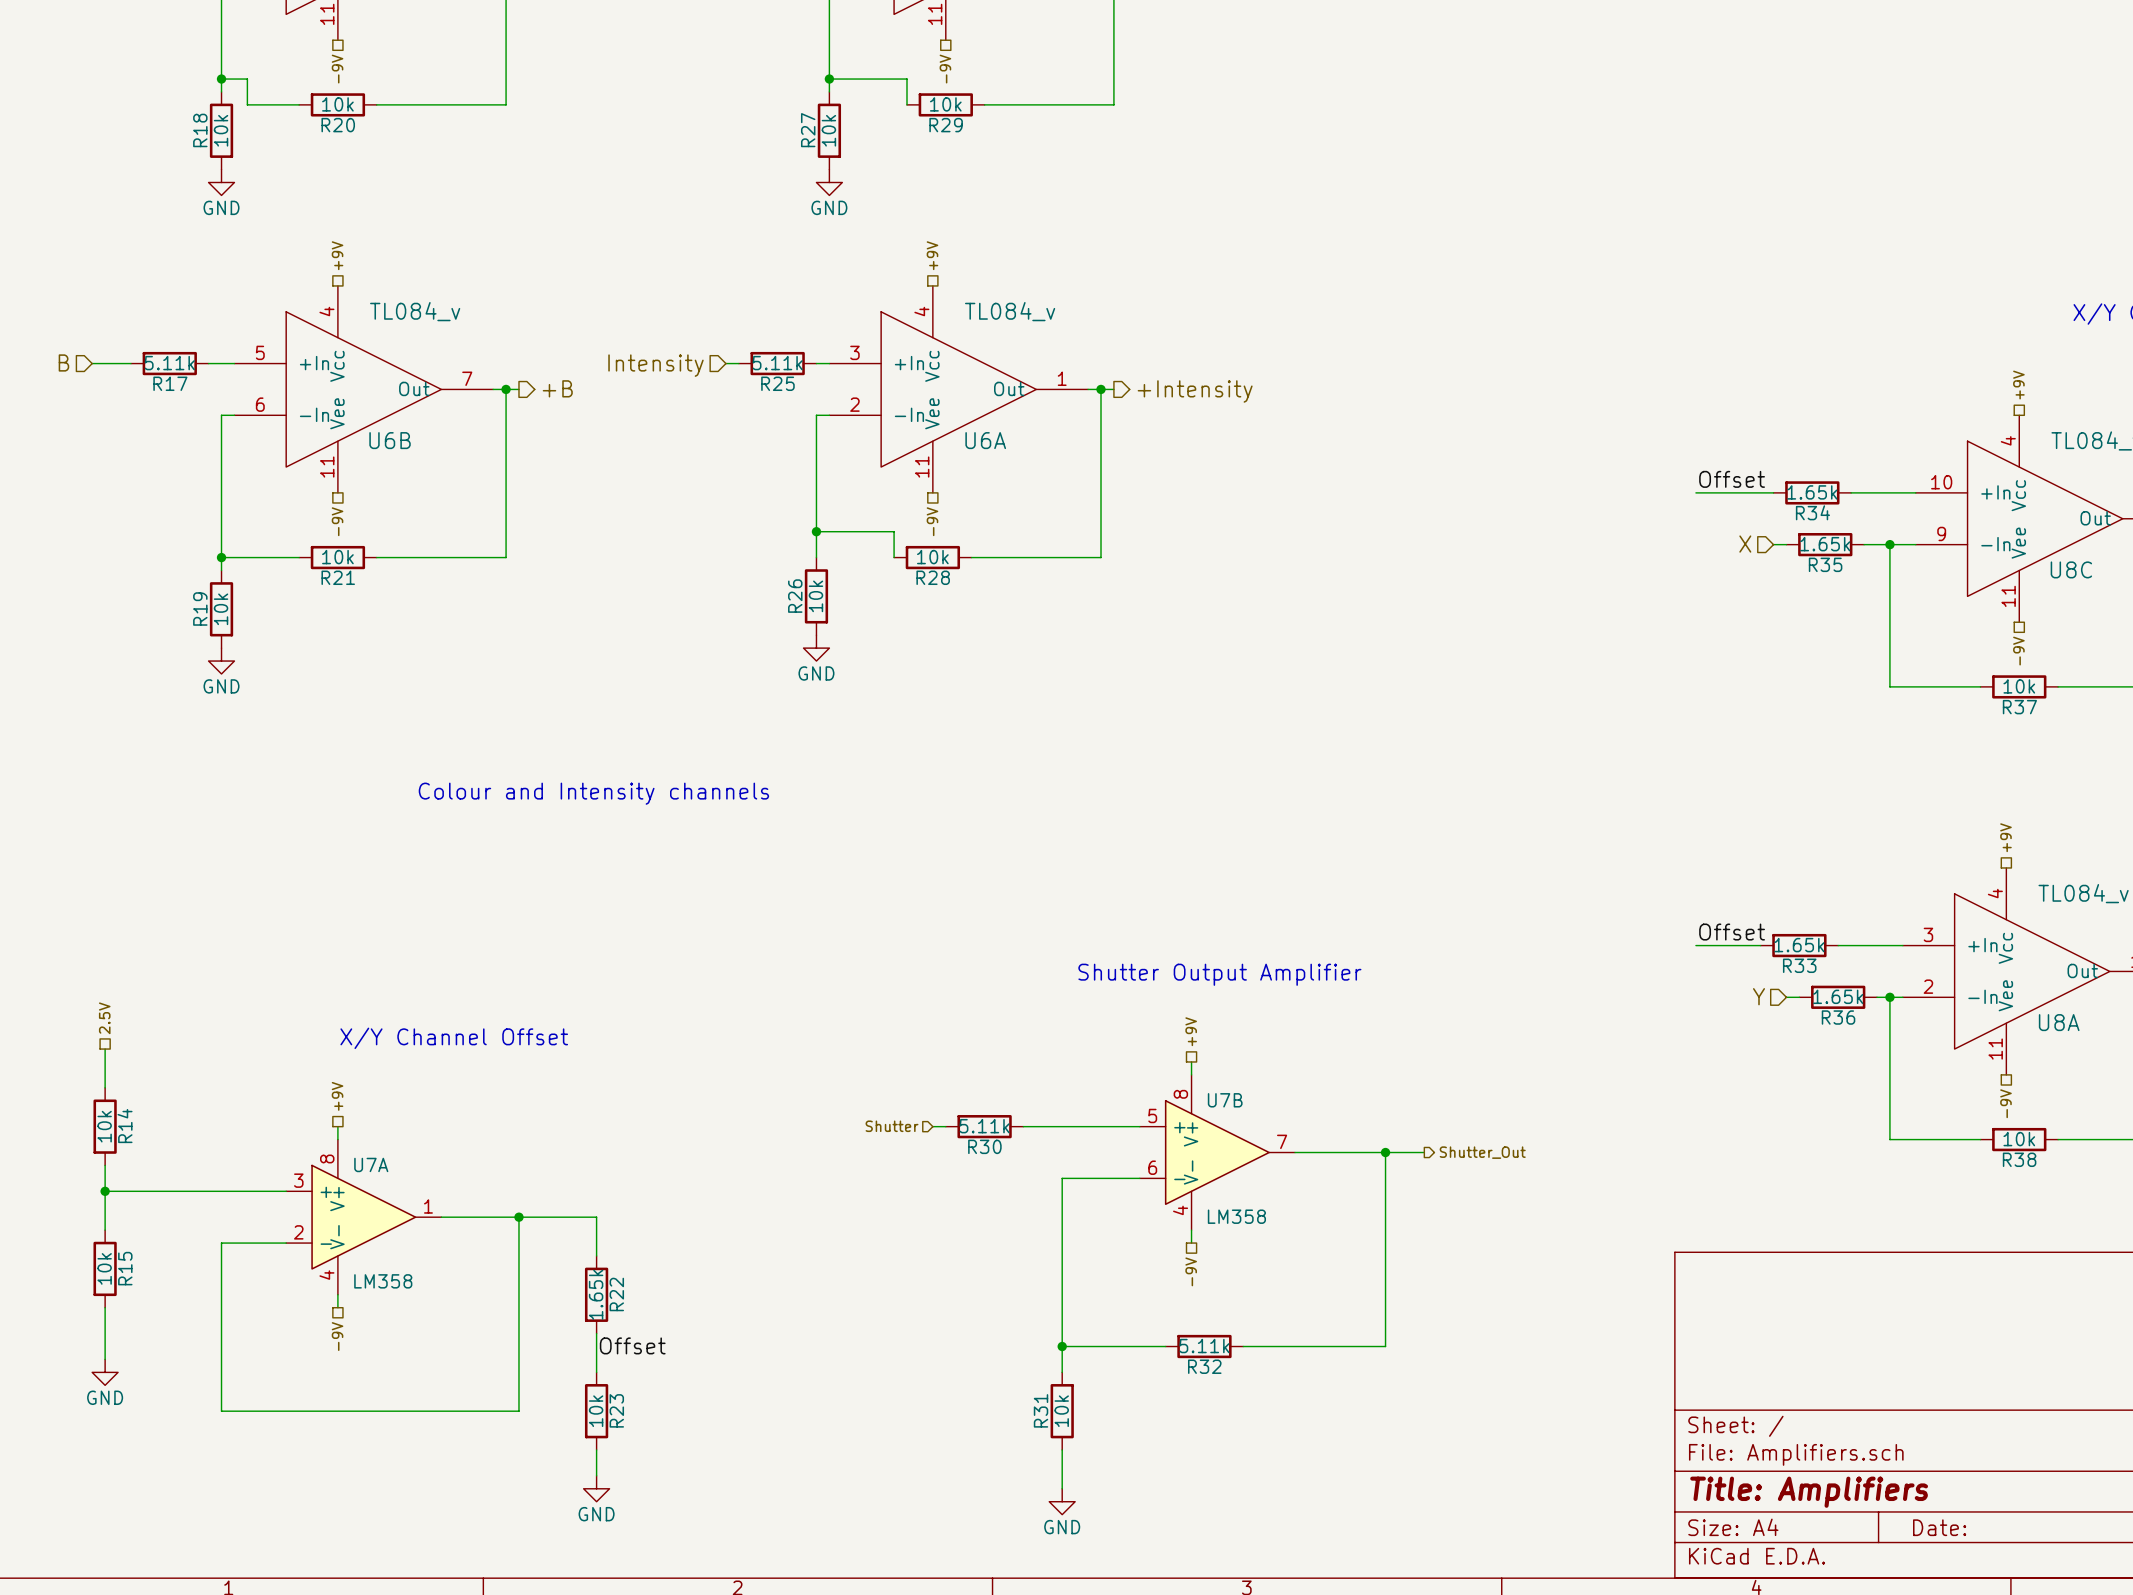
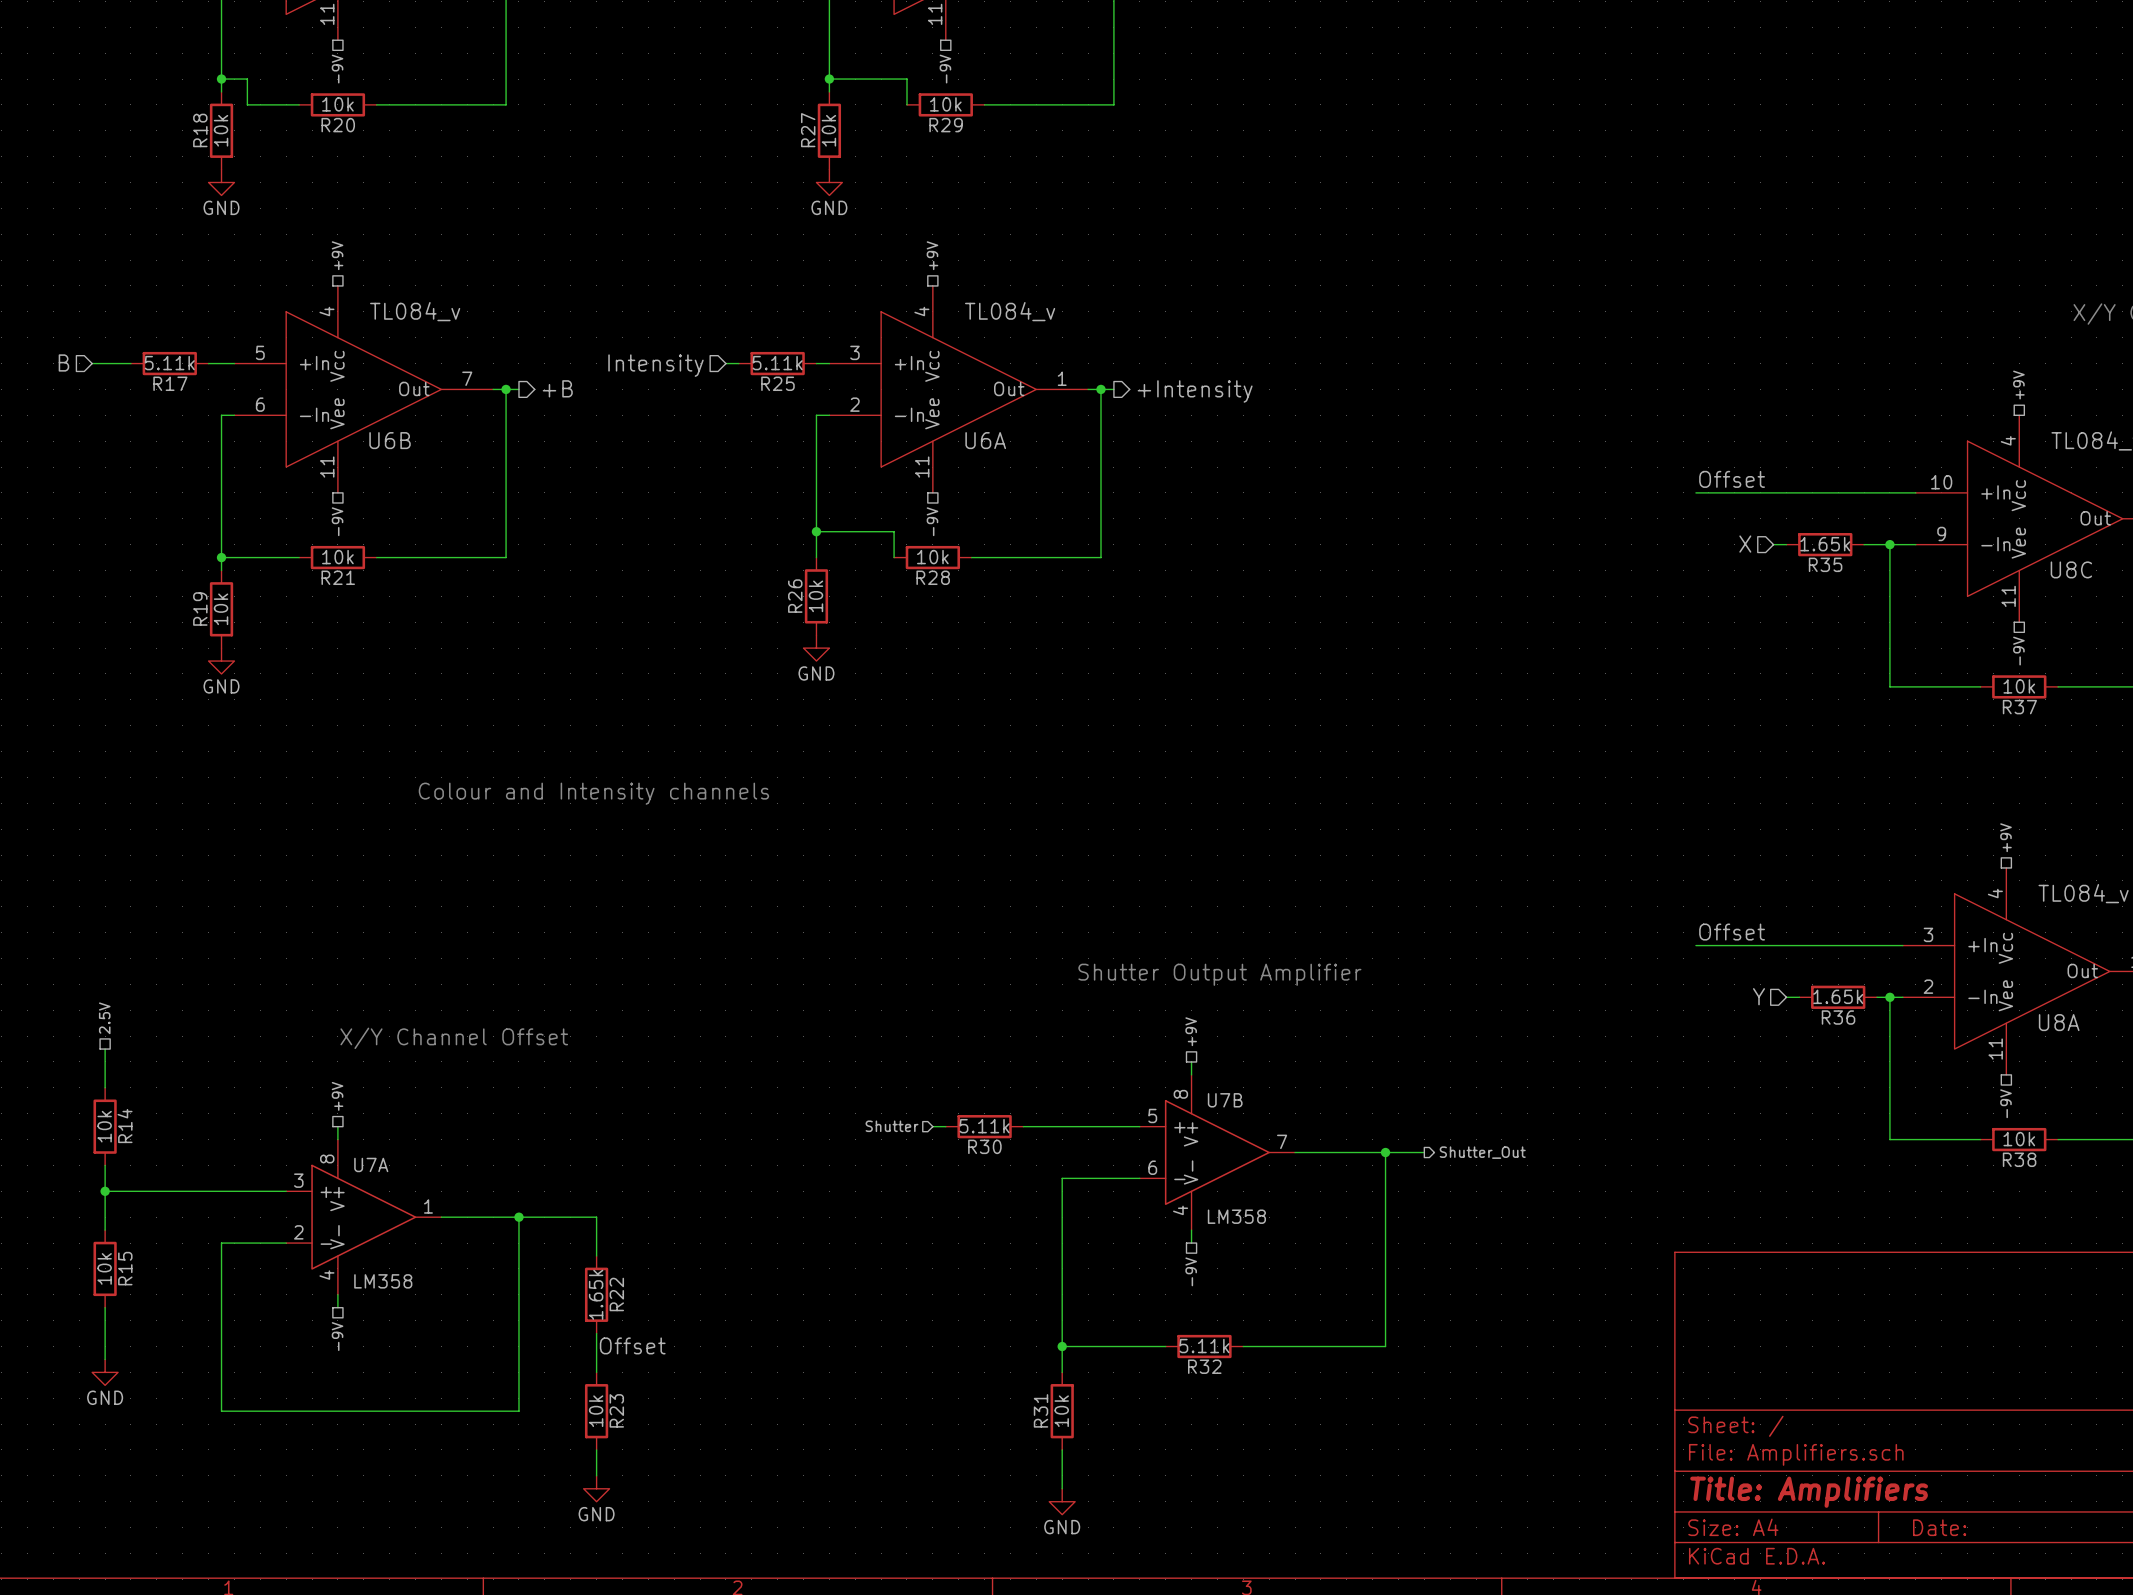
wire: none -> (1773, 492) (1851, 492)
R34: 1.65k (1812, 492) -> none
wire: none -> (1760, 945) (1838, 945)
R33: 1.65k (1799, 945) -> none

